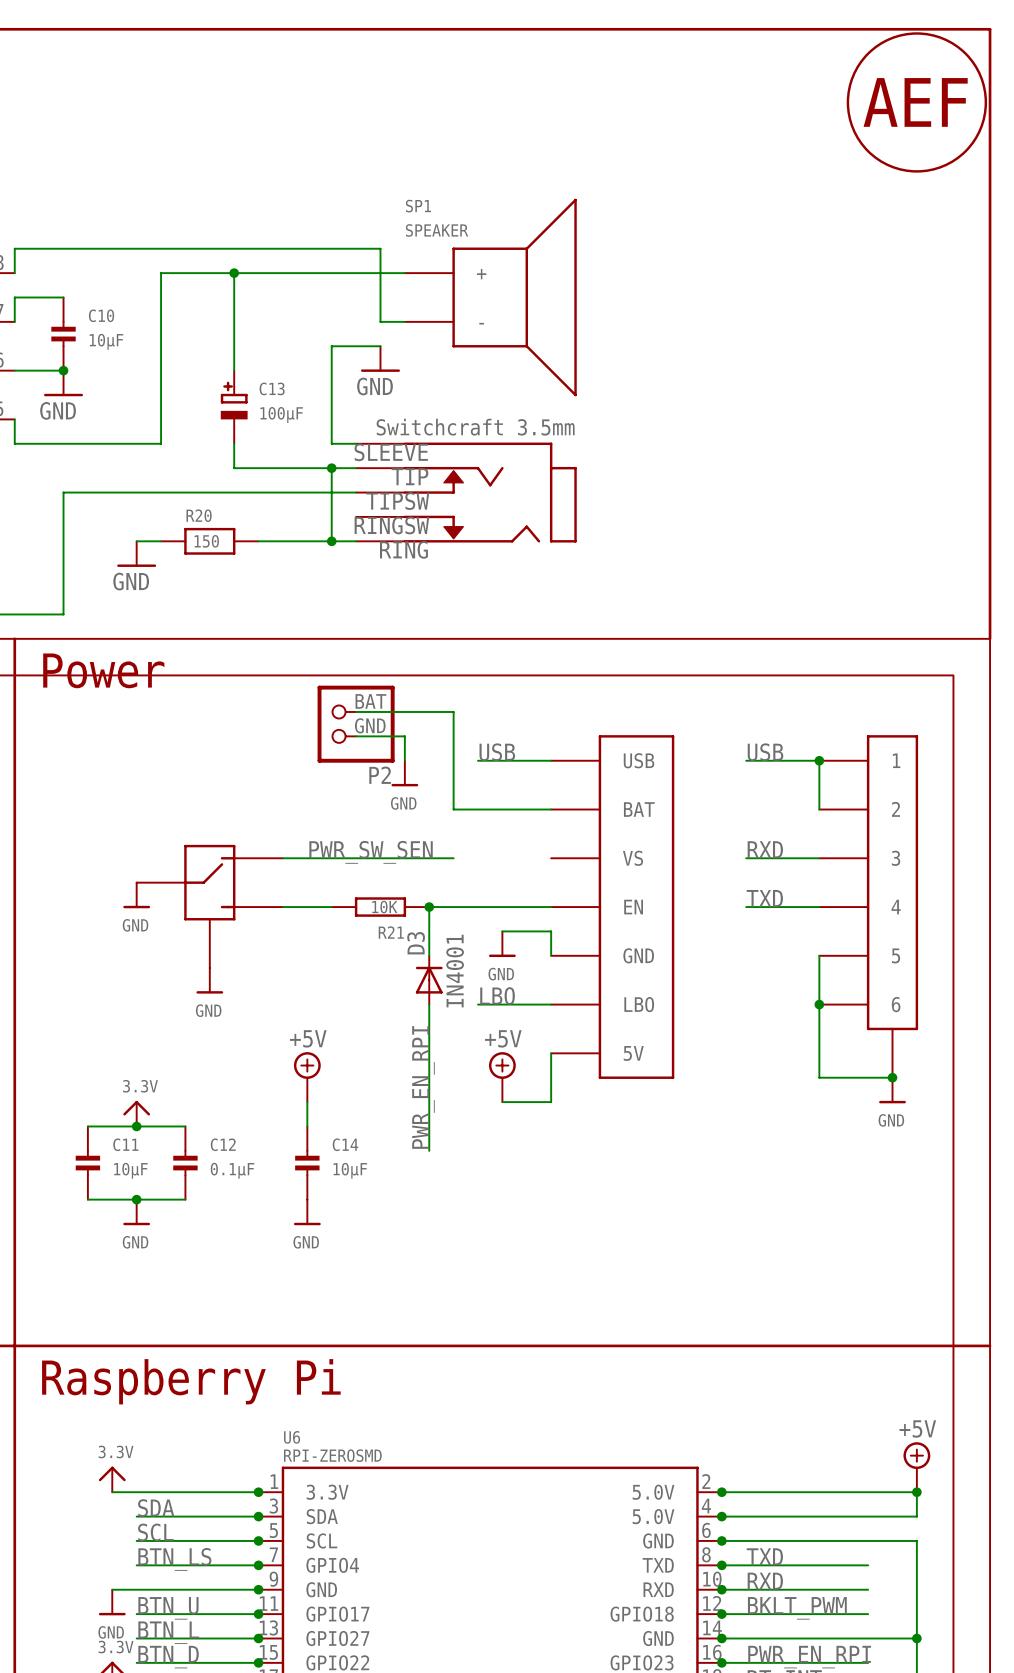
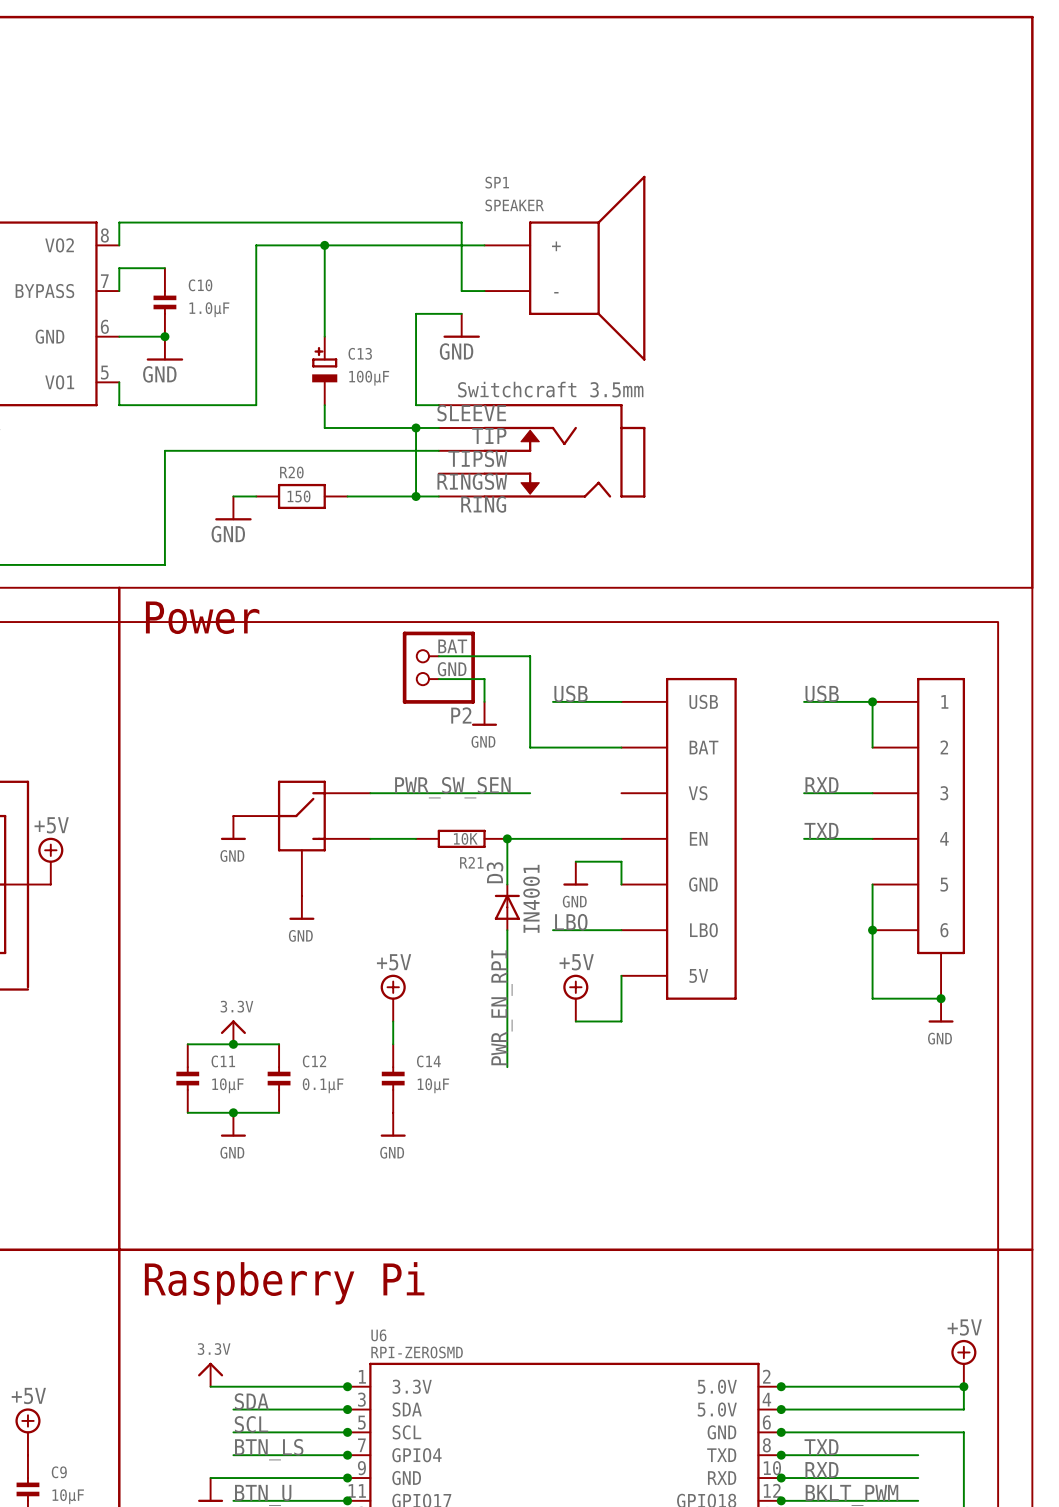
part: (916, 102) -> none
C10 value: 10μF (106, 341) -> 1.0μF (209, 309)

